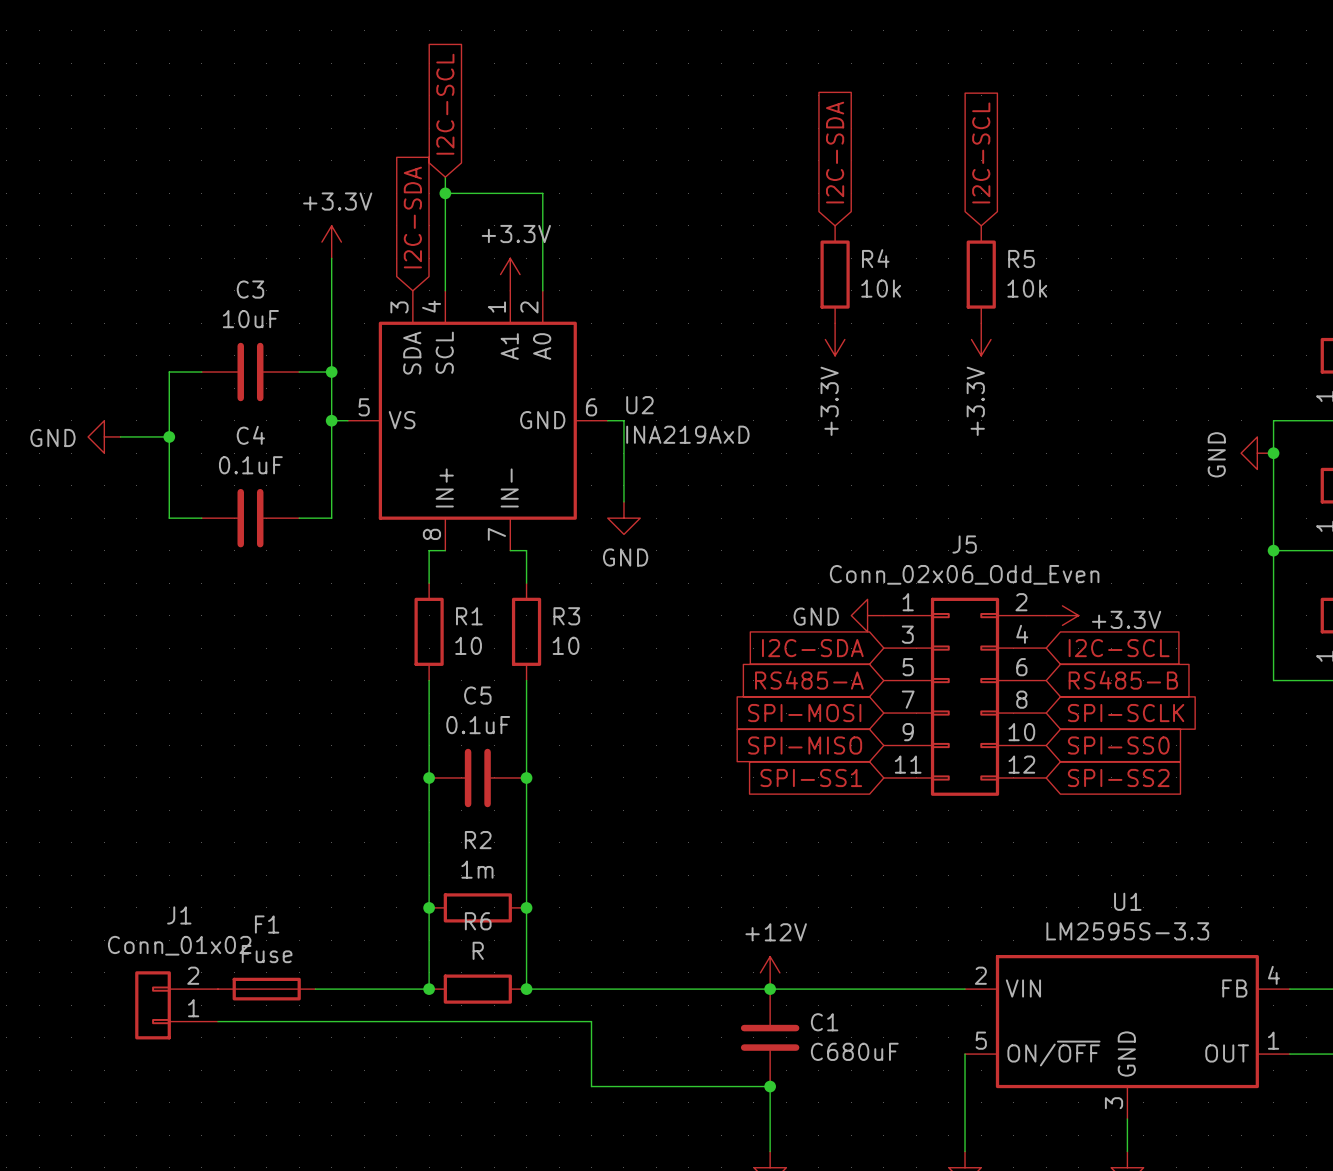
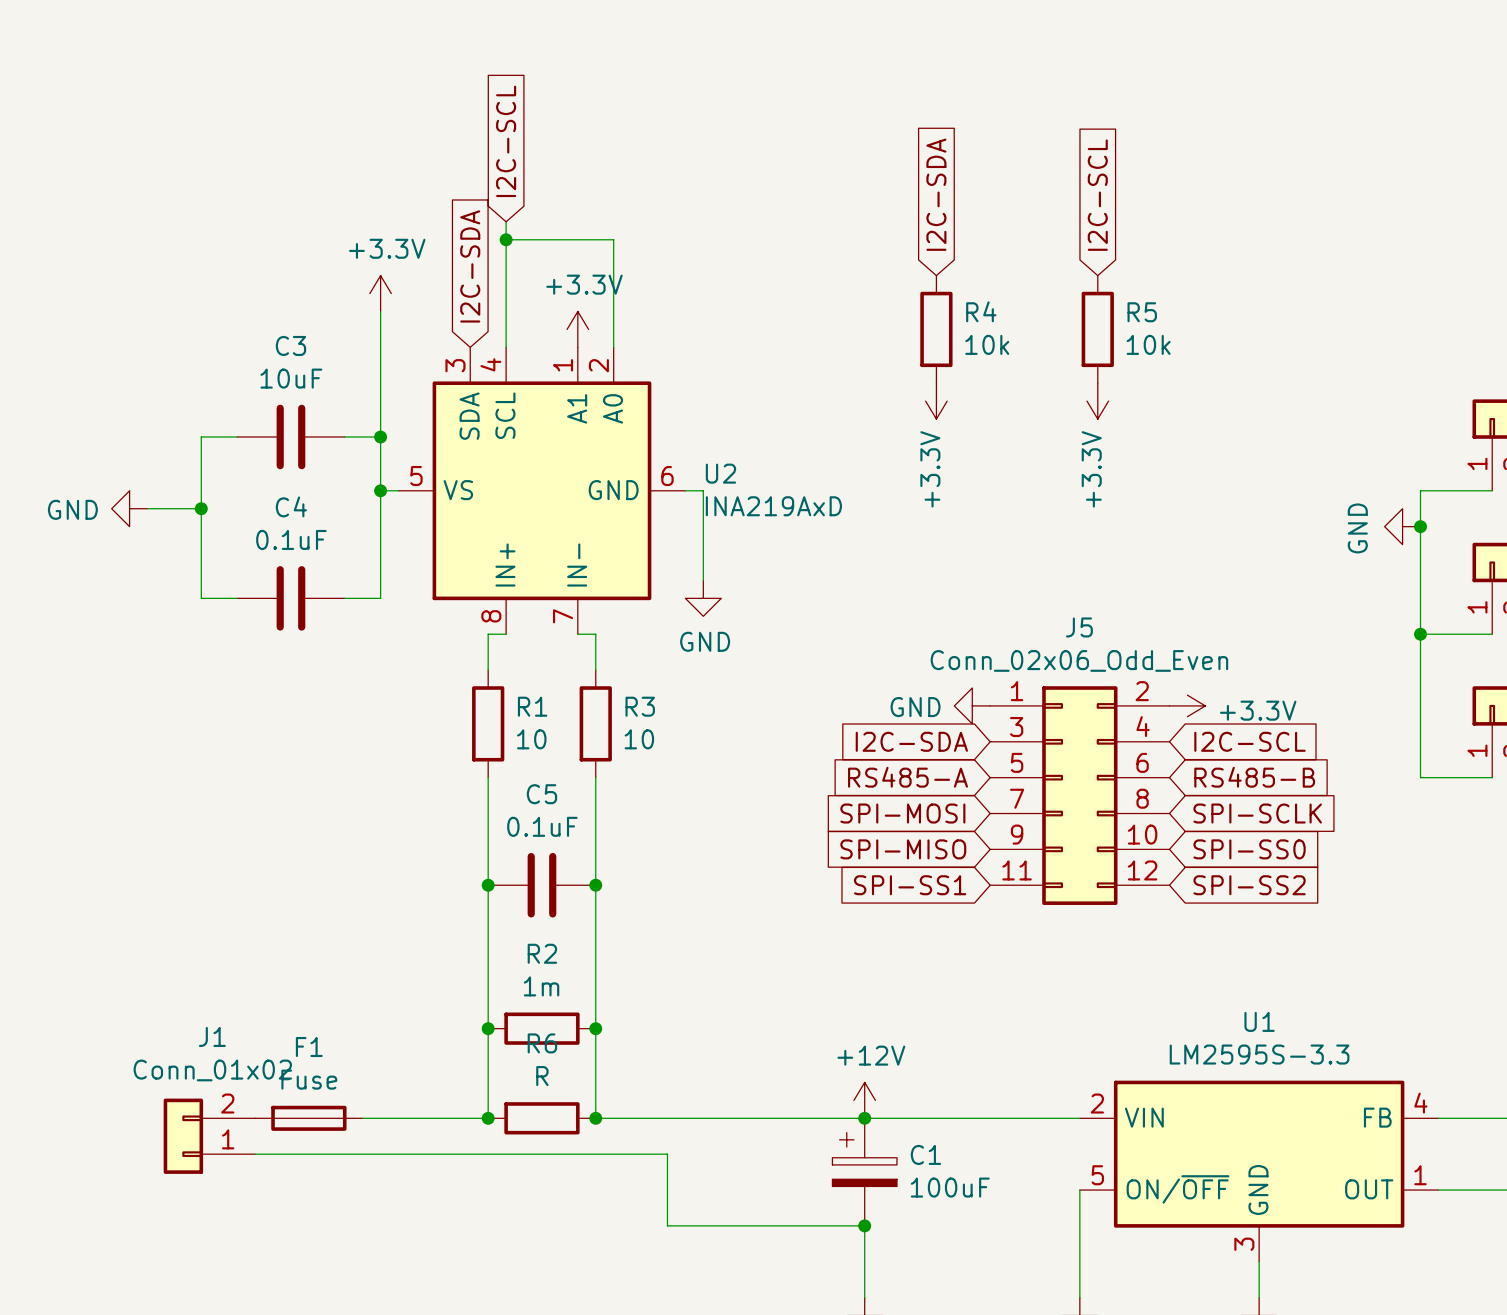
C1 symbol: [740, 989, 800, 1087] -> [832, 1118, 897, 1226]
C1 value: C680uF (854, 1051) -> 100uF (950, 1187)

